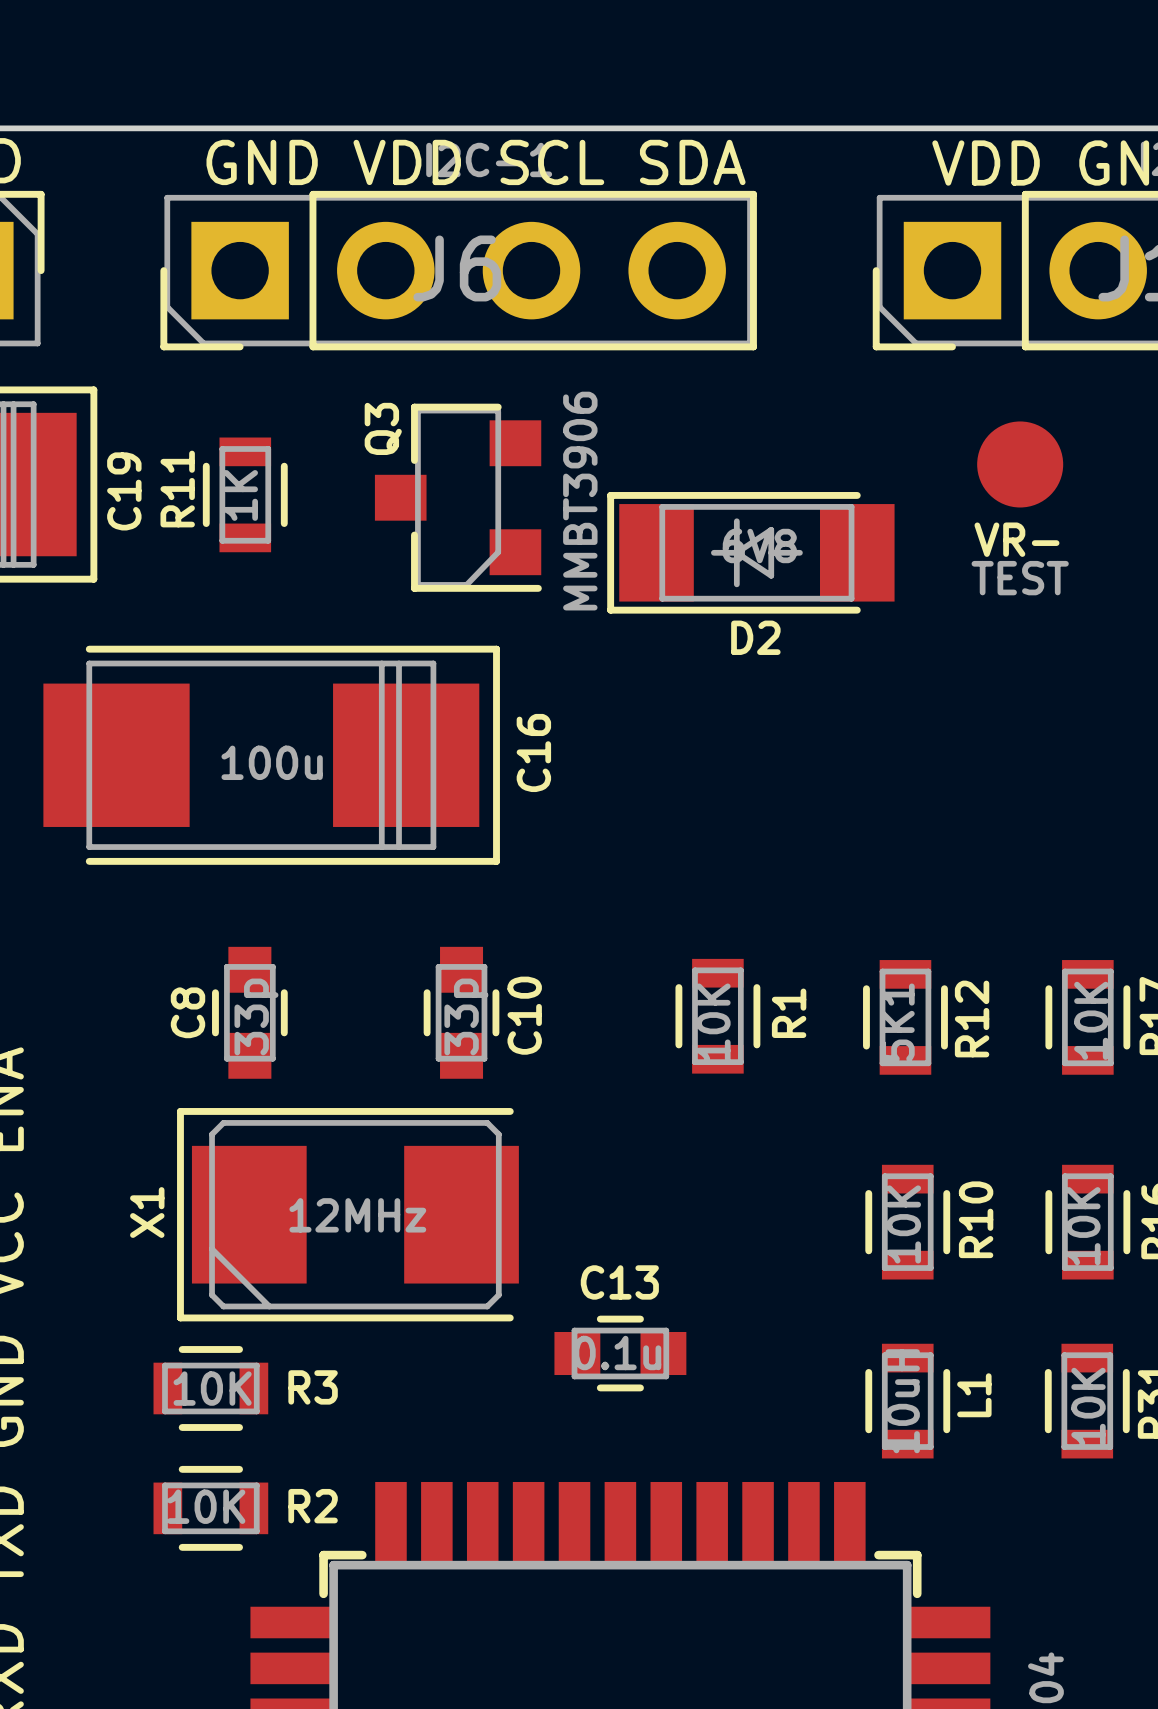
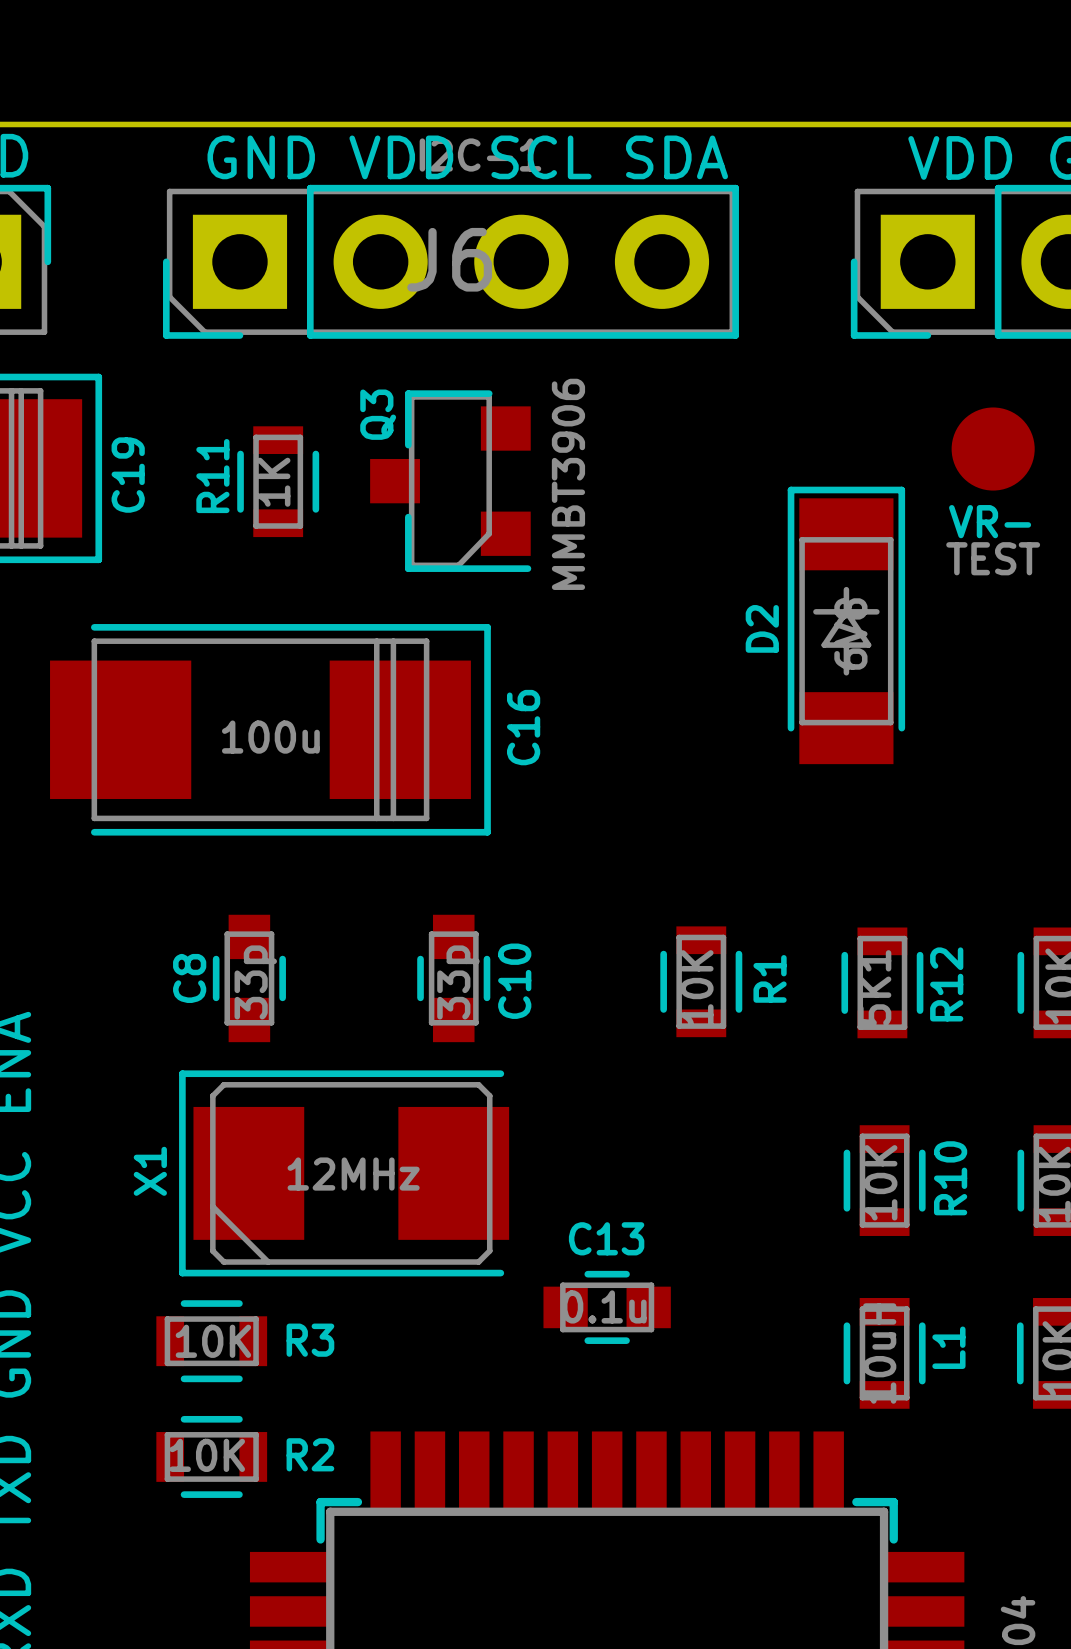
R11 position: (245, 494) -> (278, 481)
D2 rotation: 0° (750, 552) -> 90° clockwise (846, 625)

